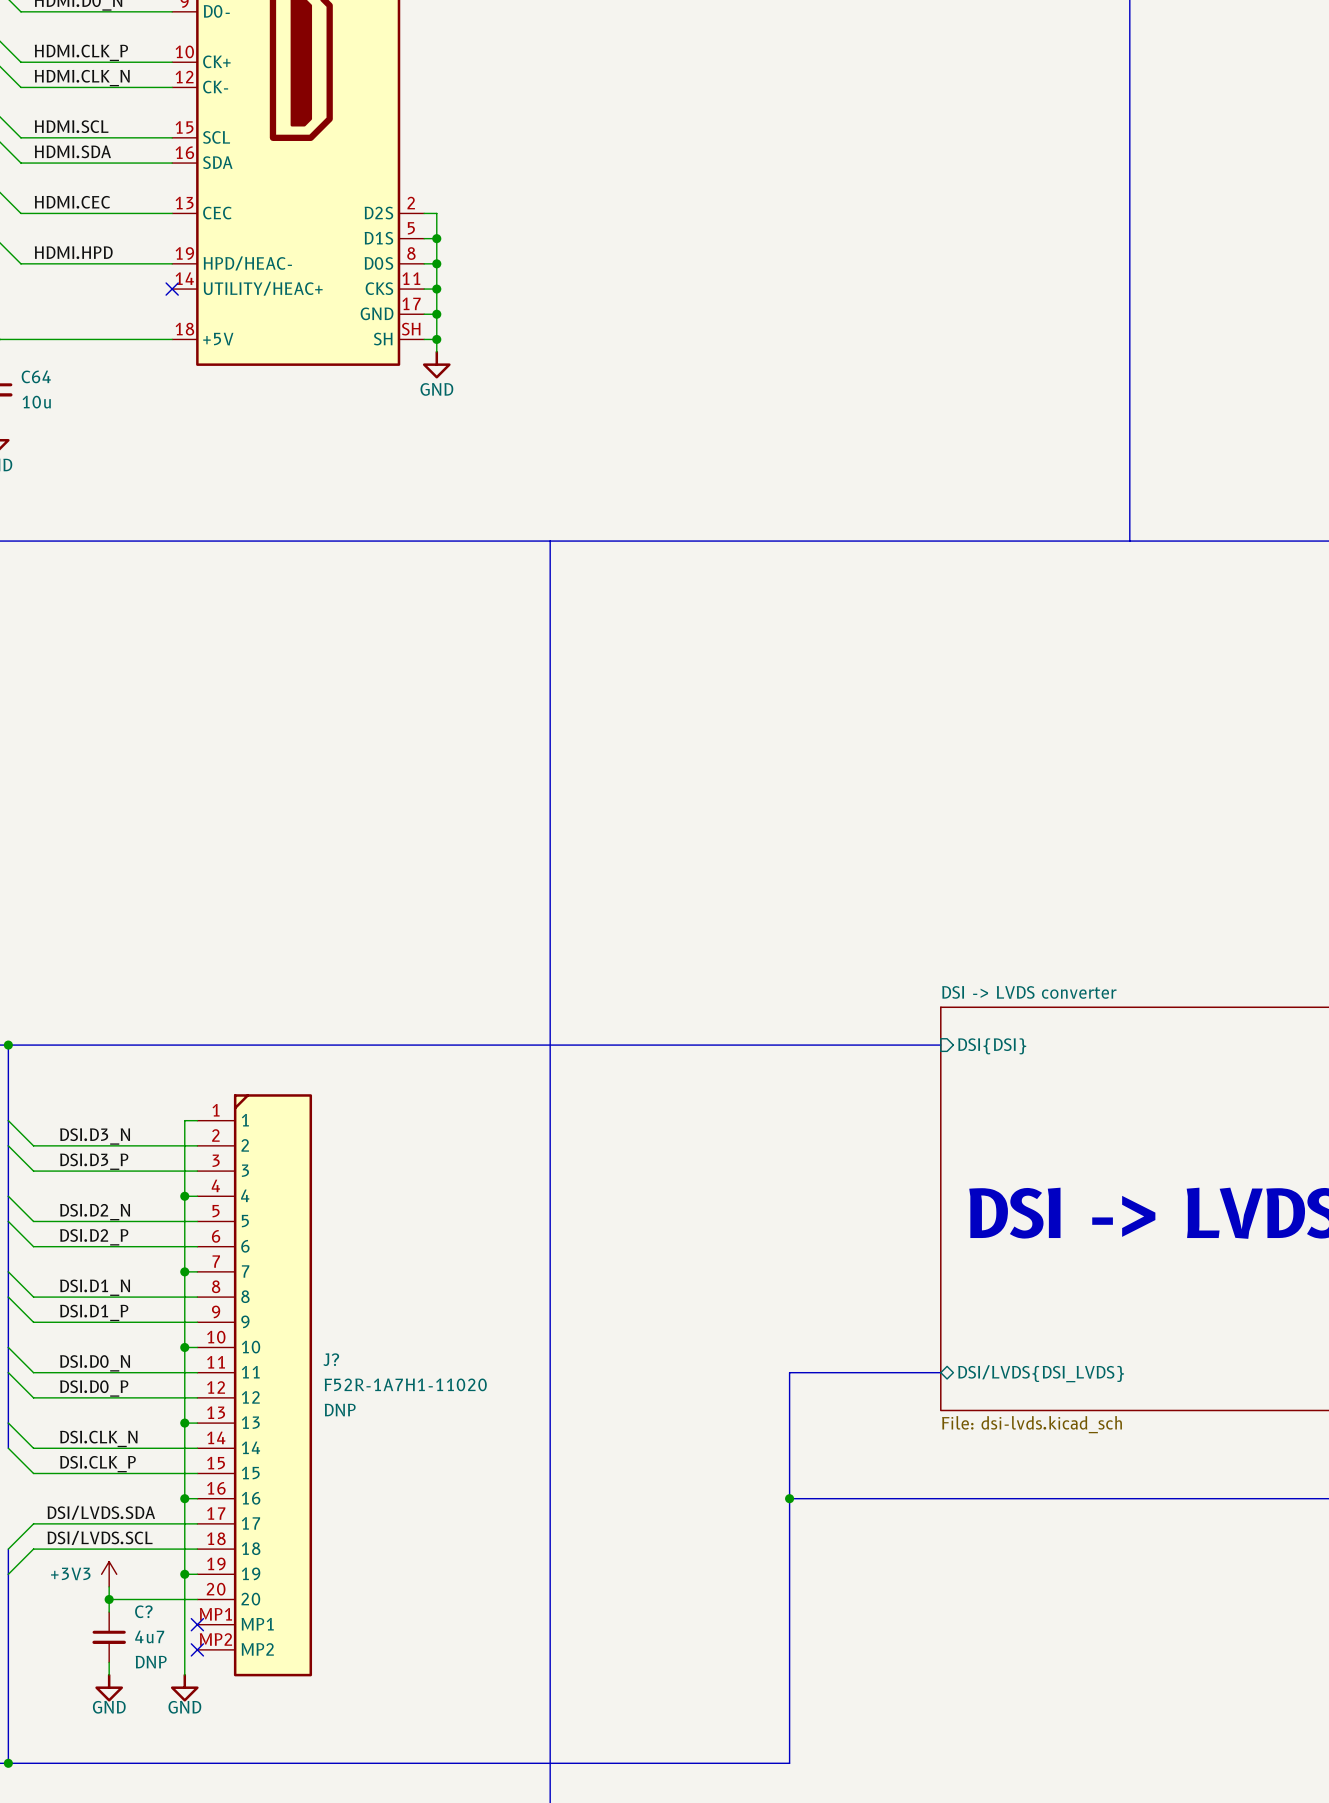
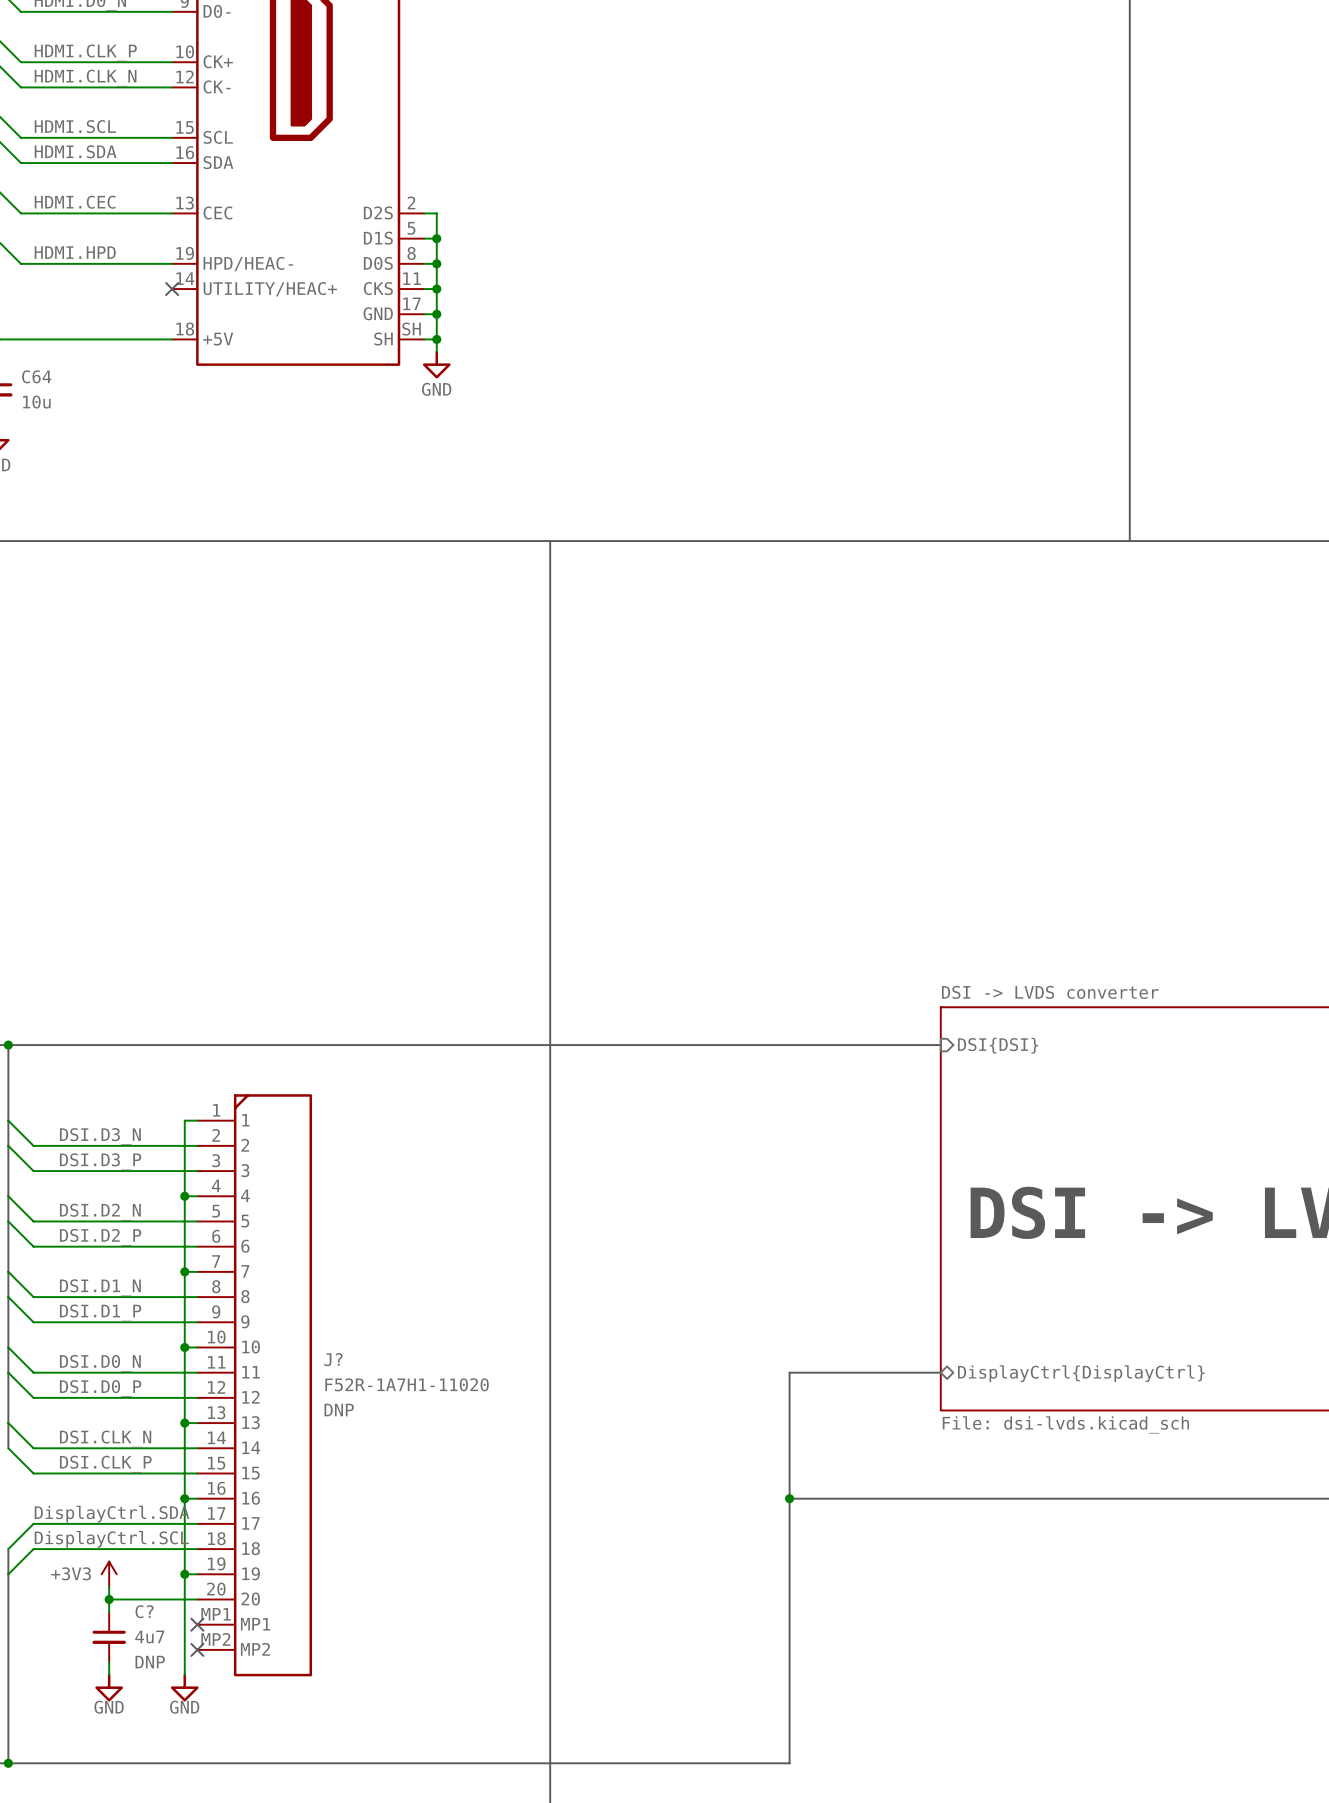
sheet pin: DSI/LVDS{DSI_LVDS} (1041, 1373) -> DisplayCtrl{DisplayCtrl} (1081, 1373)
label: DSI/LVDS.SDA (101, 1512) -> none
label: none -> DisplayCtrl.SDA (112, 1514)
label: DSI/LVDS.SCL (100, 1537) -> none
label: none -> DisplayCtrl.SCL (111, 1539)

